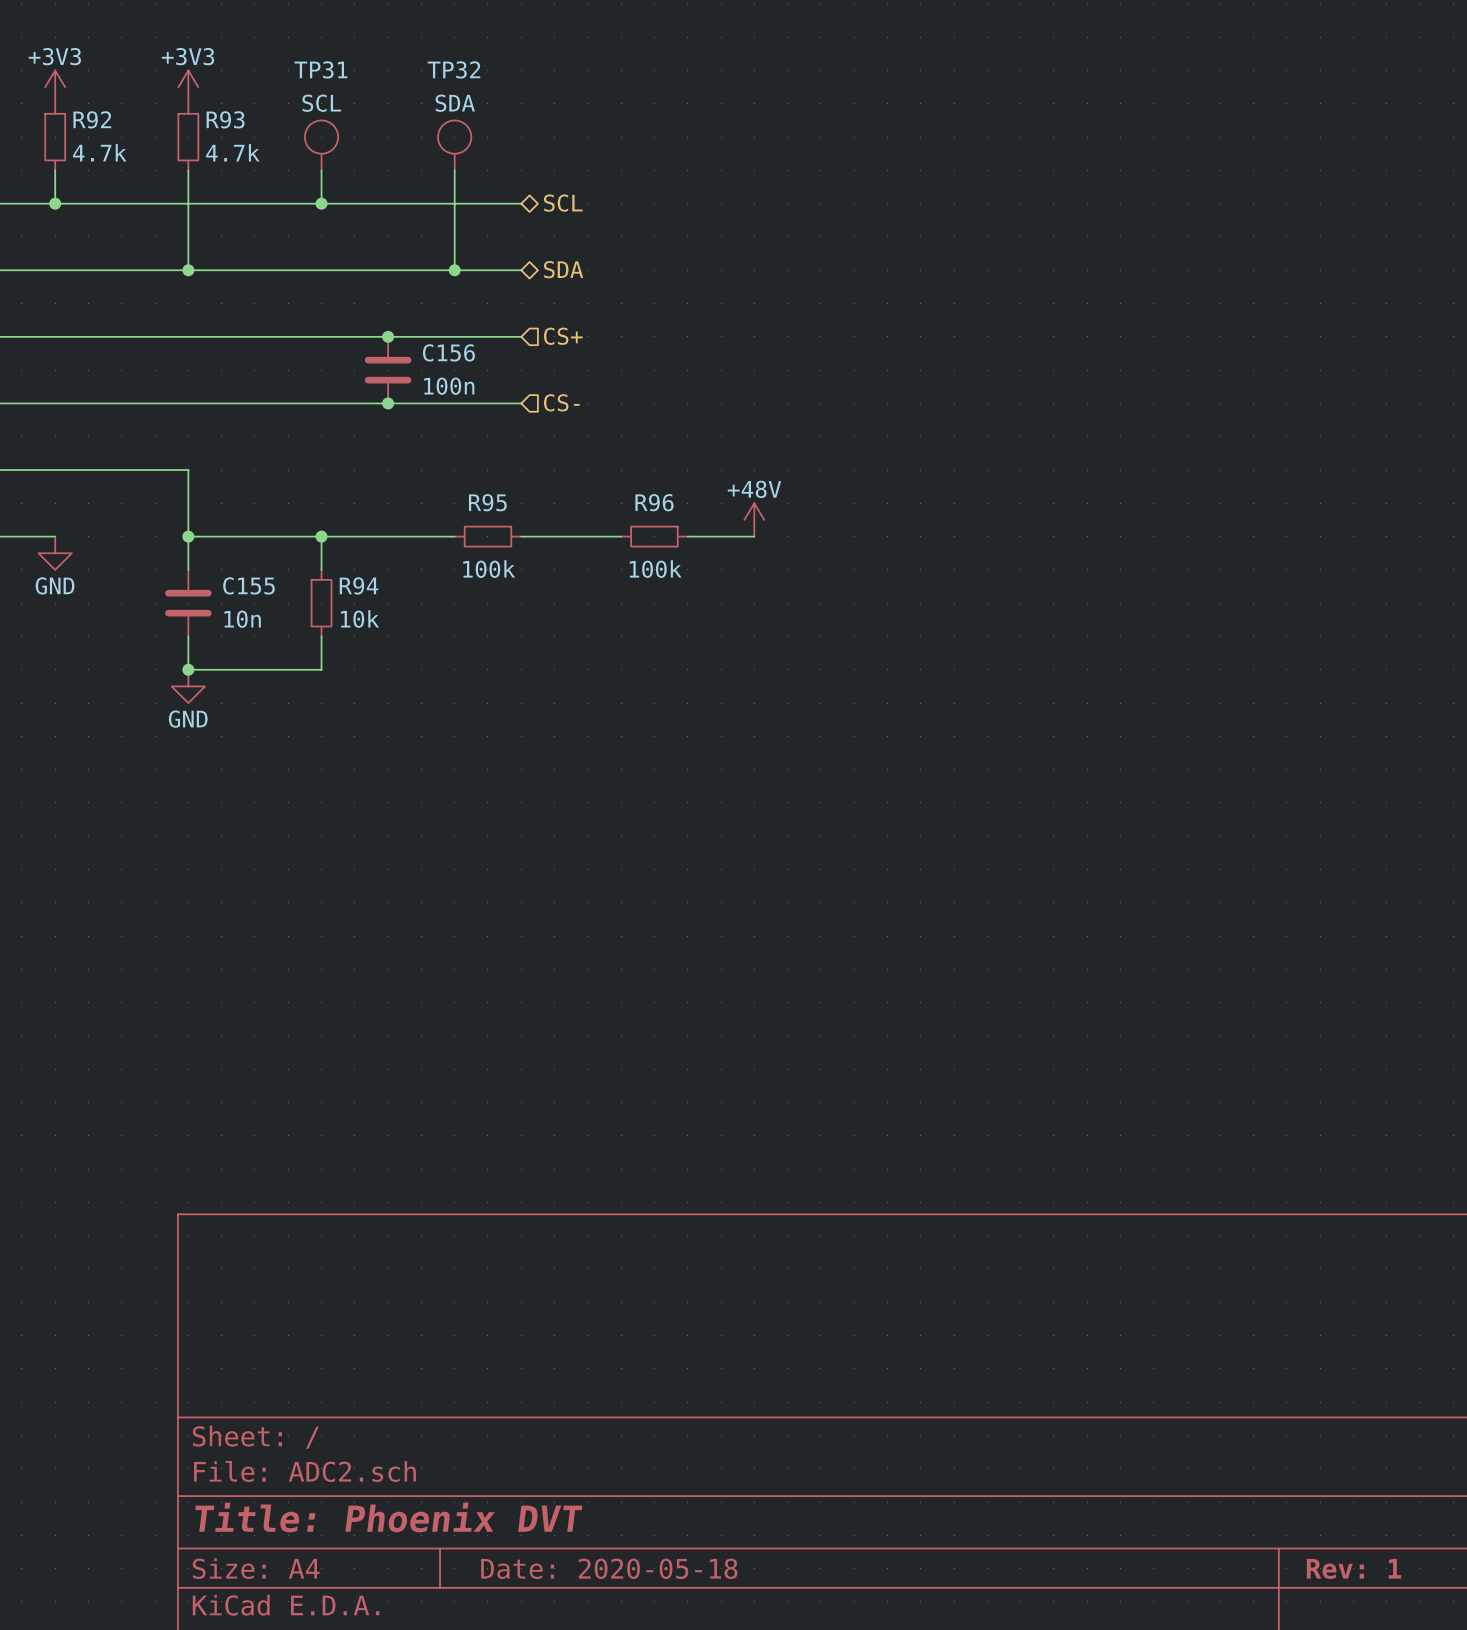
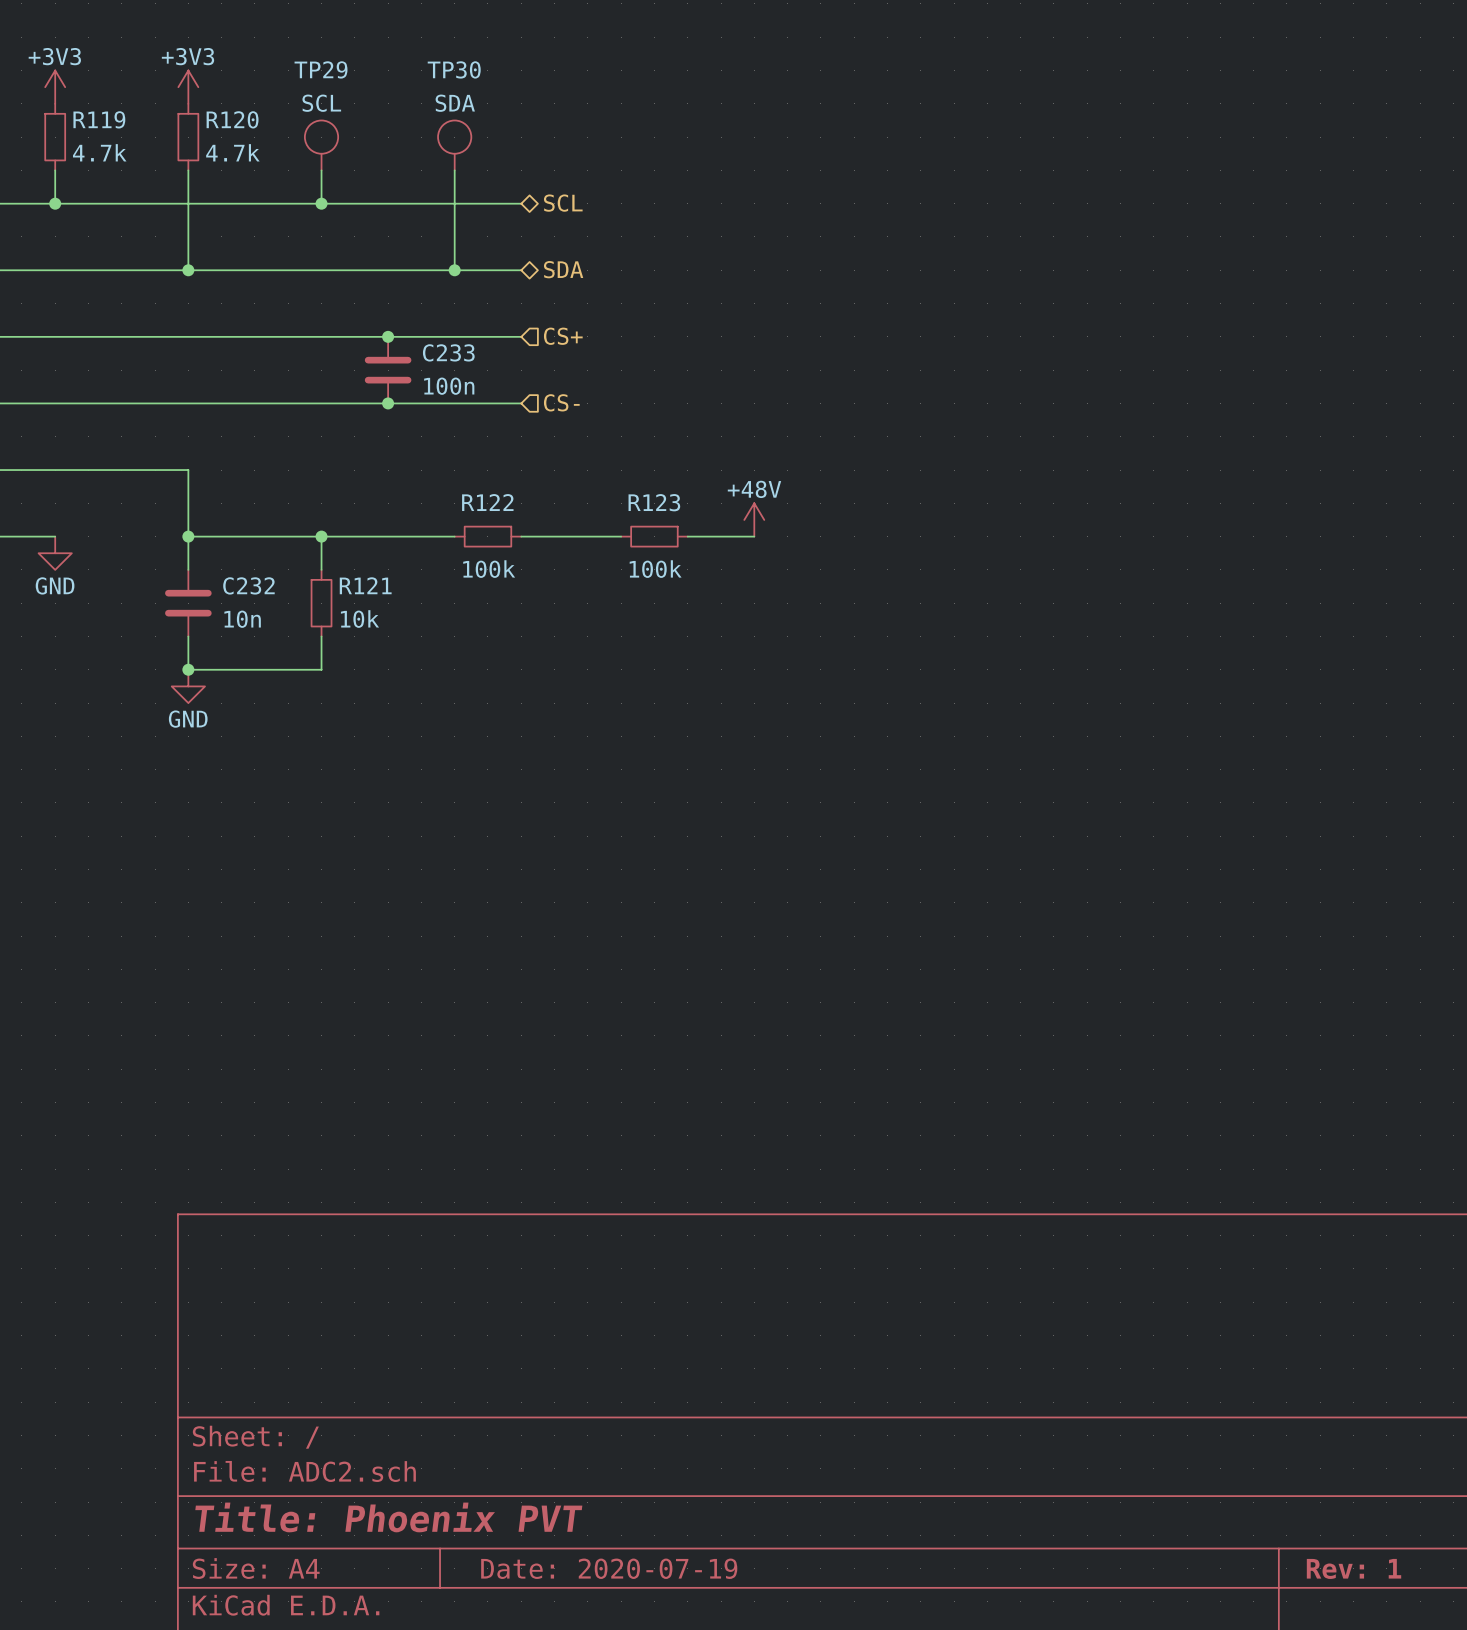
TP31 name: TP31 (321, 69) -> TP29 (321, 69)
TP32 name: TP32 (453, 69) -> TP30 (454, 69)
R92 name: R92 (92, 119) -> R119 (99, 119)
R93 name: R93 (225, 119) -> R120 (232, 119)
C156 name: C156 (448, 352) -> C233 (448, 352)
R95 name: R95 (487, 502) -> R122 (487, 502)
R96 name: R96 (654, 502) -> R123 (654, 502)
C155 name: C155 (249, 585) -> C232 (248, 585)
R94 name: R94 (359, 585) -> R121 (365, 585)
title block: Title: Phoenix DVT (388, 1517) -> Title: Phoenix PVT (388, 1517)
title block: Date: 2020-05-18 (609, 1568) -> Date: 2020-07-19 (609, 1568)

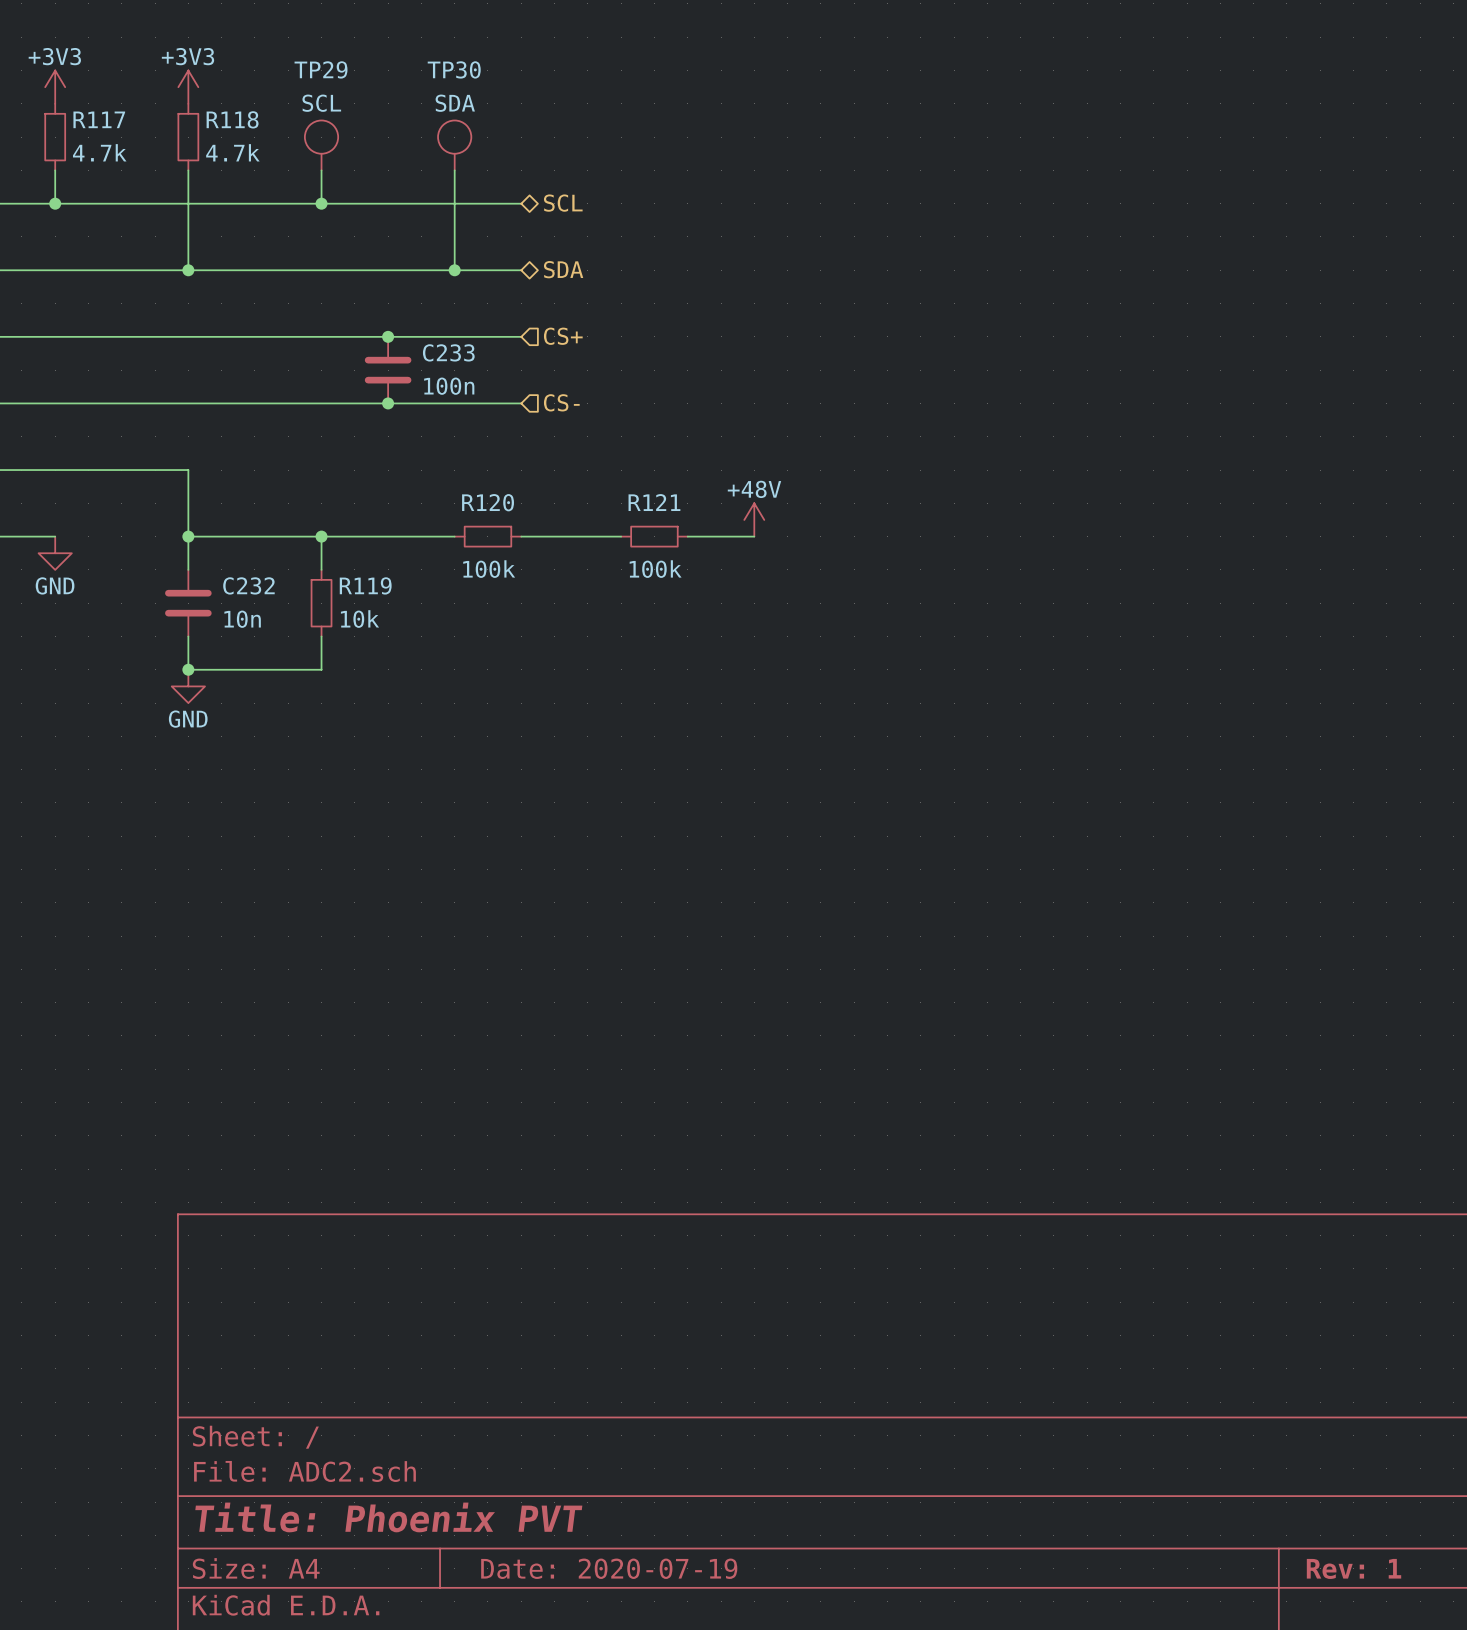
R119 name: R119 (99, 119) -> R117 (99, 119)
R120 name: R120 (232, 119) -> R118 (232, 119)
R122 name: R122 (487, 502) -> R120 (488, 502)
R123 name: R123 (654, 502) -> R121 (654, 502)
R121 name: R121 (365, 585) -> R119 (365, 585)

